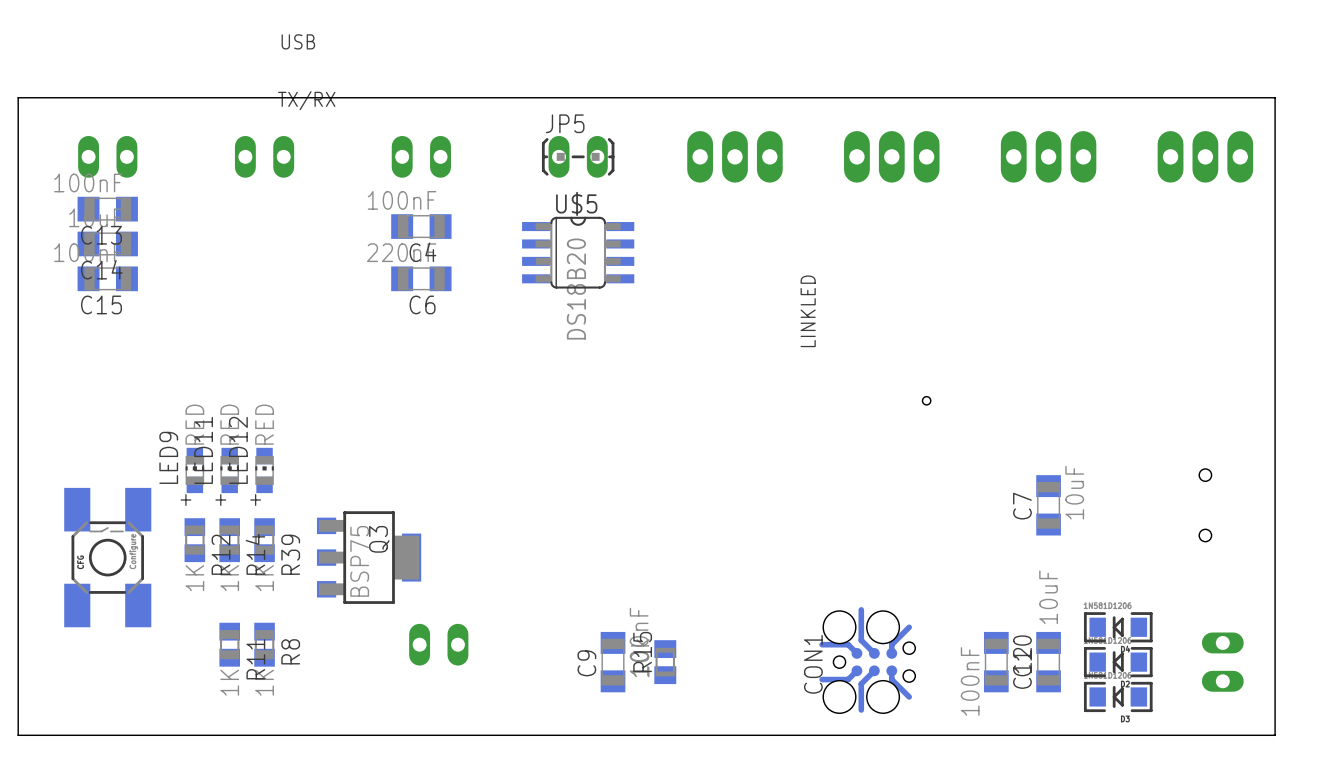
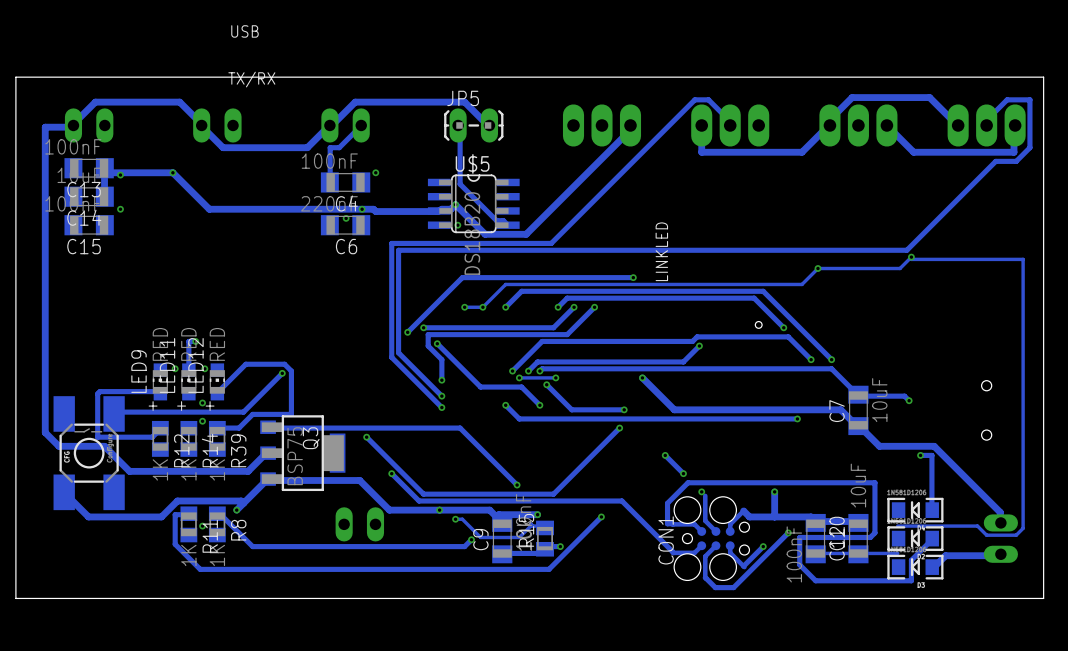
track: none -> (361, 125) (339, 147) (330, 147) (329, 182)
track: none -> (458, 125) (460, 127) (460, 184) (496, 220) (503, 220) (508, 225)
track: none -> (489, 125) (464, 102) (355, 102) (307, 147) (223, 147) (179, 102) (95, 102) (72, 127) (45, 127) (45, 432) (58, 446) (104, 446) (129, 471) (248, 471) (268, 453)
track: none -> (630, 125) (628, 131) (526, 234) (485, 234) (455, 204) (450, 209) (437, 211) (375, 211) (373, 209) (209, 209) (172, 172) (106, 172) (104, 168) (104, 196)
track: none -> (730, 125) (729, 120) (708, 99) (694, 99) (551, 243) (391, 243) (391, 357) (441, 407)
track: none -> (958, 125) (929, 97) (852, 97) (831, 118) (831, 124) (802, 152) (701, 152) (701, 125)
track: none -> (986, 125) (986, 120) (1007, 99) (1029, 99) (1029, 147) (1016, 161) (995, 161) (906, 250) (398, 250) (398, 352) (441, 396)
track: none -> (1015, 125) (1013, 152) (913, 152) (886, 125)
via: none -> (172, 172)
via: none -> (375, 172)
via: none -> (120, 175)
via: none -> (455, 204)
via: none -> (120, 209)
via: none -> (362, 209)
via: none -> (346, 218)
via: none -> (457, 225)
via: none -> (911, 257)
via: none -> (817, 268)
track: none -> (633, 277) (462, 277) (407, 332)
via: none -> (633, 277)
track: none -> (464, 307) (482, 307) (505, 284) (802, 284) (817, 268) (900, 268) (911, 257) (911, 259) (1023, 259) (1023, 528) (1016, 535) (986, 535) (977, 526) (897, 526)
via: none -> (464, 307)
via: none -> (482, 307)
track: none -> (505, 307) (521, 291) (763, 291) (831, 359)
via: none -> (505, 307)
track: none -> (558, 307) (567, 298) (754, 298) (783, 327)
via: none -> (558, 307)
track: none -> (574, 307) (553, 327) (423, 327)
via: none -> (574, 307)
track: none -> (594, 307) (567, 334) (428, 334) (428, 346) (441, 359) (441, 380)
via: none -> (594, 307)
via: none -> (423, 327)
via: none -> (783, 327)
via: none -> (407, 332)
track: none -> (195, 341) (188, 341) (188, 370)
via: none -> (195, 341)
track: none -> (437, 343) (480, 387) (521, 387) (539, 405)
via: none -> (437, 343)
track: none -> (699, 346) (683, 361) (537, 361) (528, 371)
via: none -> (699, 346)
track: none -> (811, 359) (788, 336) (697, 336) (692, 341) (542, 341) (512, 371)
via: none -> (811, 359)
via: none -> (831, 359)
via: none -> (175, 368)
via: none -> (204, 368)
via: none -> (512, 371)
via: none -> (528, 371)
track: none -> (539, 371) (542, 368) (831, 368) (859, 396) (904, 396) (909, 400)
via: none -> (539, 371)
track: none -> (282, 373) (243, 412) (115, 412) (114, 413)
via: none -> (282, 373)
via: none -> (519, 377)
track: none -> (555, 377) (519, 377)
via: none -> (555, 377)
track: none -> (642, 377) (674, 409) (840, 409) (879, 446) (934, 446) (1000, 512) (1000, 522)
via: none -> (642, 377)
via: none -> (441, 380)
track: none -> (546, 384) (571, 409) (624, 409)
via: none -> (546, 384)
track: none -> (160, 393) (159, 391) (99, 391) (97, 393) (97, 437) (152, 437) (160, 428)
track: none -> (217, 393) (245, 364) (284, 364) (291, 371) (291, 414) (252, 414) (239, 428) (217, 428)
via: none -> (441, 396)
via: none -> (909, 400)
via: none -> (202, 402)
track: none -> (505, 405) (519, 418) (797, 418)
via: none -> (505, 405)
via: none -> (539, 405)
via: none -> (441, 407)
via: none -> (624, 409)
via: none -> (797, 418)
via: none -> (202, 421)
track: none -> (268, 427) (460, 428) (517, 485)
track: none -> (619, 428) (553, 494) (423, 494) (366, 437)
via: none -> (619, 428)
via: none -> (366, 437)
track: none -> (665, 455) (683, 473)
via: none -> (665, 455)
track: none -> (920, 455) (931, 455) (932, 510)
via: none -> (920, 455)
track: none -> (391, 473) (419, 501) (621, 501) (673, 552)
via: none -> (391, 473)
via: none -> (683, 473)
via: none -> (517, 485)
via: none -> (701, 491)
track: none -> (774, 491) (774, 516)
via: none -> (774, 491)
track: none -> (64, 492) (88, 516) (161, 516) (177, 501) (241, 501) (243, 503)
track: none -> (236, 510) (268, 479) (359, 480) (389, 510) (489, 510) (502, 522) (498, 514) (537, 514)
via: none -> (236, 510)
via: none -> (439, 510)
track: none -> (743, 510) (749, 516) (811, 516) (815, 522) (858, 522)
track: none -> (188, 513) (175, 514) (175, 544) (200, 569) (549, 569) (601, 516)
track: none -> (217, 513) (220, 514) (252, 546) (464, 546) (471, 539)
via: none -> (537, 514)
via: none -> (601, 516)
track: none -> (455, 519) (462, 519) (480, 537) (519, 537) (530, 523) (533, 526) (544, 526) (545, 527)
via: none -> (455, 519)
track: none -> (673, 524) (667, 523) (667, 503) (688, 482) (874, 482) (874, 532) (870, 537) (799, 537) (799, 564) (815, 580) (911, 580) (911, 560) (932, 538)
via: none -> (202, 526)
track: none -> (788, 532) (733, 587) (715, 587) (705, 577)
via: none -> (788, 532)
via: none -> (471, 539)
track: none -> (560, 546) (549, 546) (542, 553) (502, 554)
via: none -> (560, 546)
track: none -> (763, 546) (743, 566)
via: none -> (763, 546)
track: none -> (897, 553) (815, 554)
track: none -> (1000, 554) (945, 555) (932, 567)

